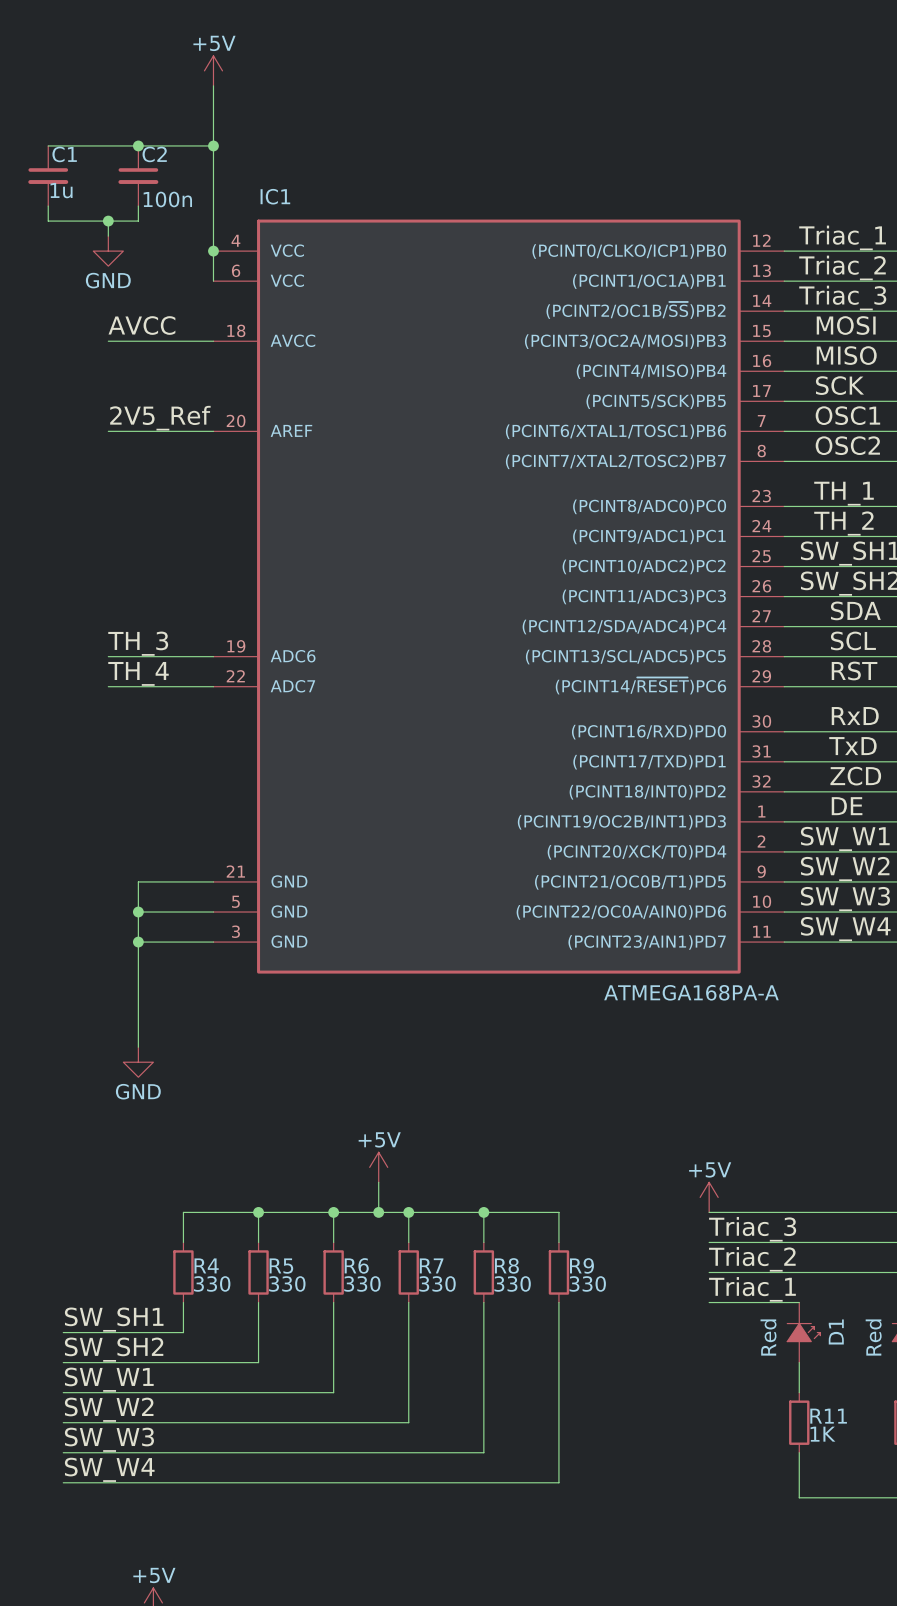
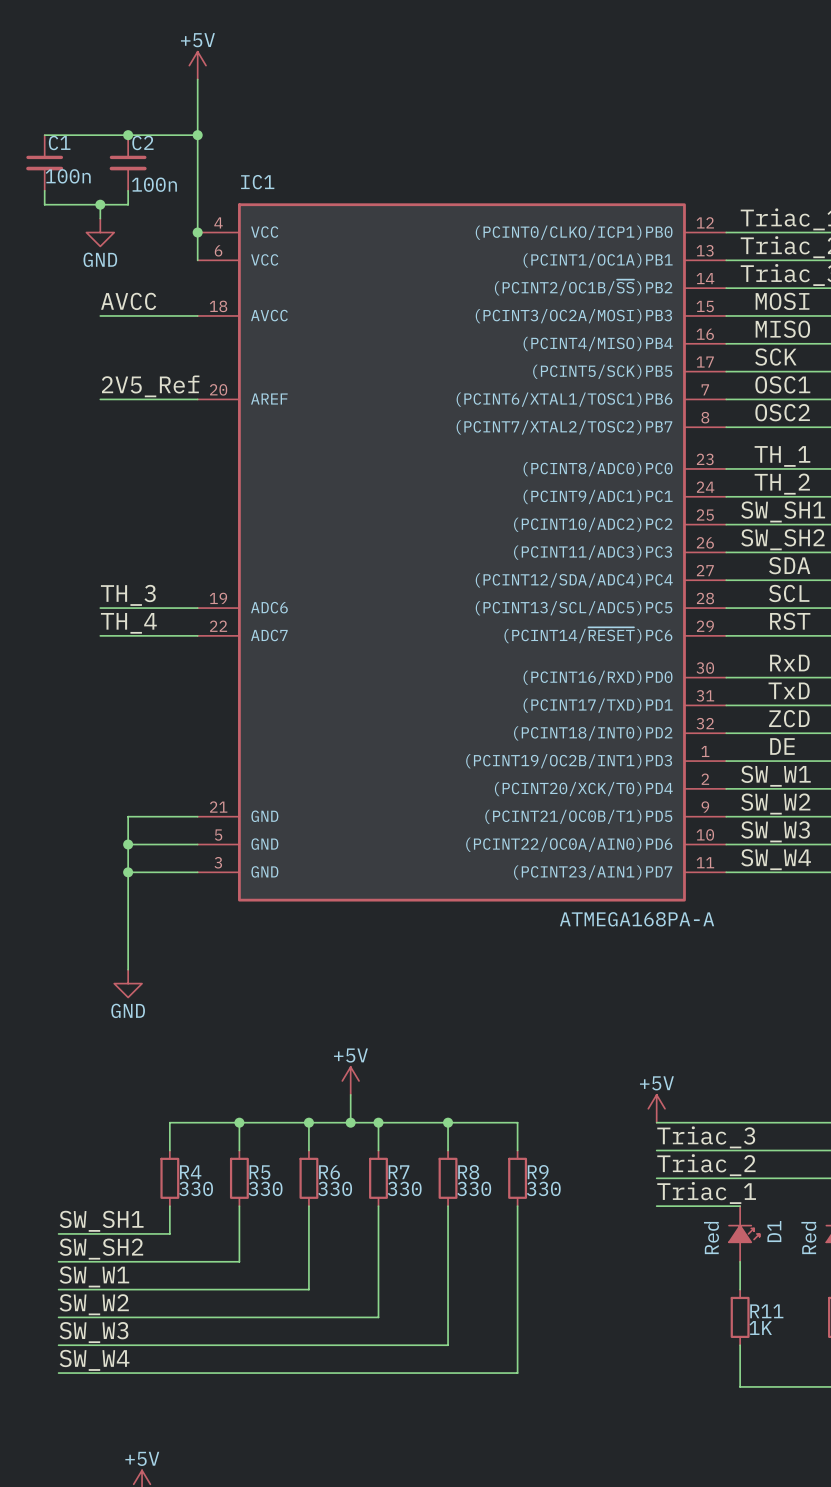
C1 value: 1u (61, 190) -> 100n (68, 176)

